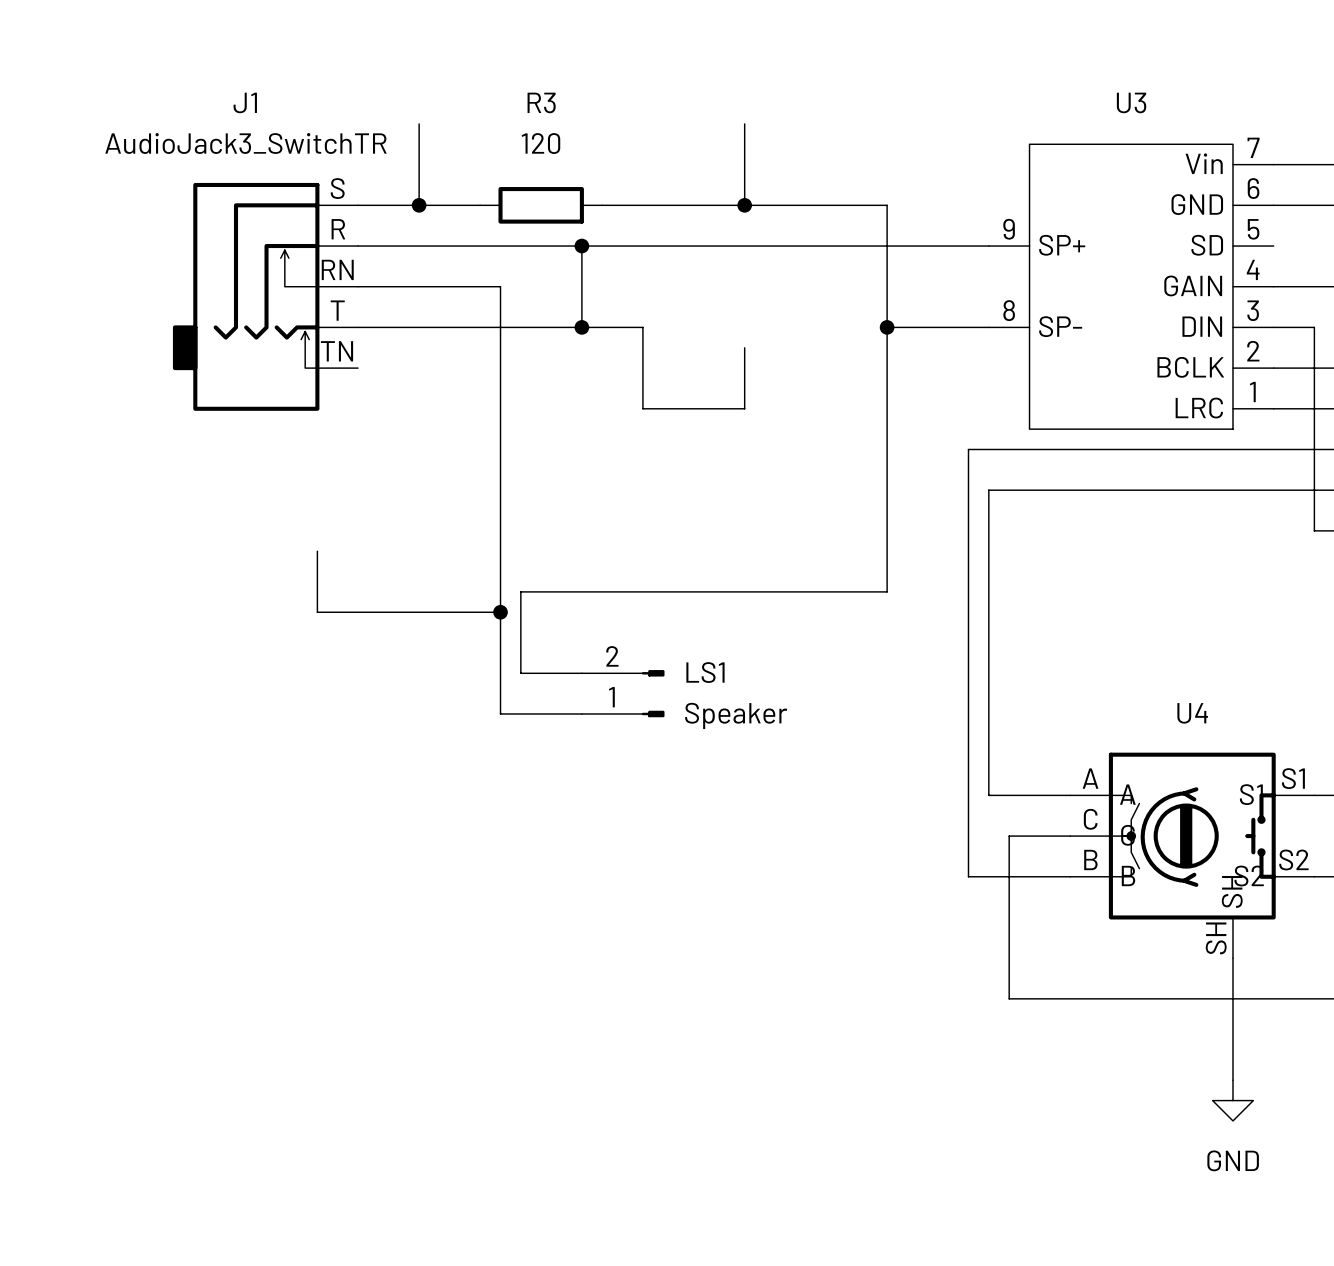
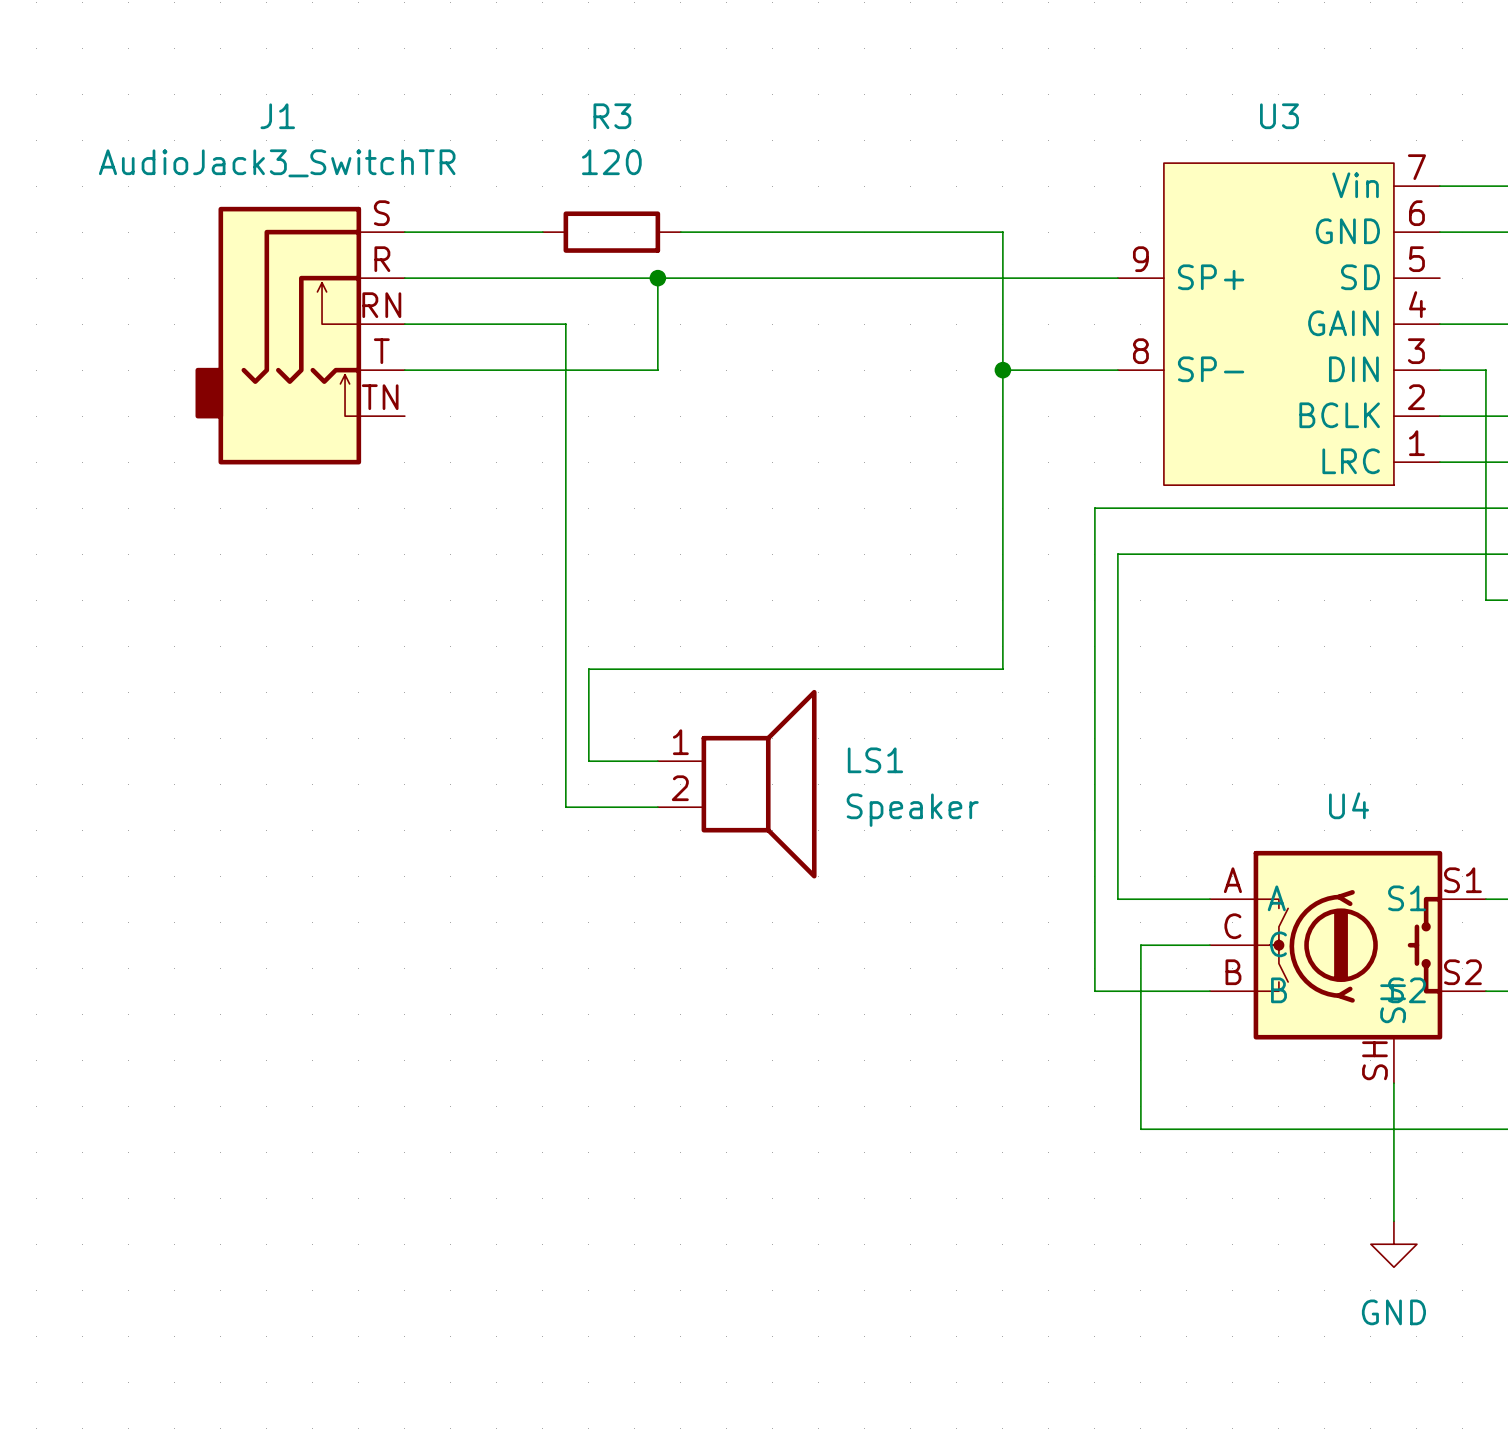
wire: (419, 123) (419, 205) -> none
wire: (744, 123) (744, 205) -> none
junction: (419, 205) -> none
junction: (744, 205) -> none
wire: (581, 327) (642, 327) (642, 408) (744, 408) (744, 347) -> none
junction: (581, 327) -> none
wire: (317, 551) (317, 612) (500, 612) -> none
junction: (500, 612) -> none
LS1 symbol: [581, 670, 665, 718] -> [657, 689, 817, 879]
LS1 name position: LS1 (705, 672) -> LS1 (875, 760)
LS1 value position: Speaker (736, 715) -> Speaker (912, 810)

